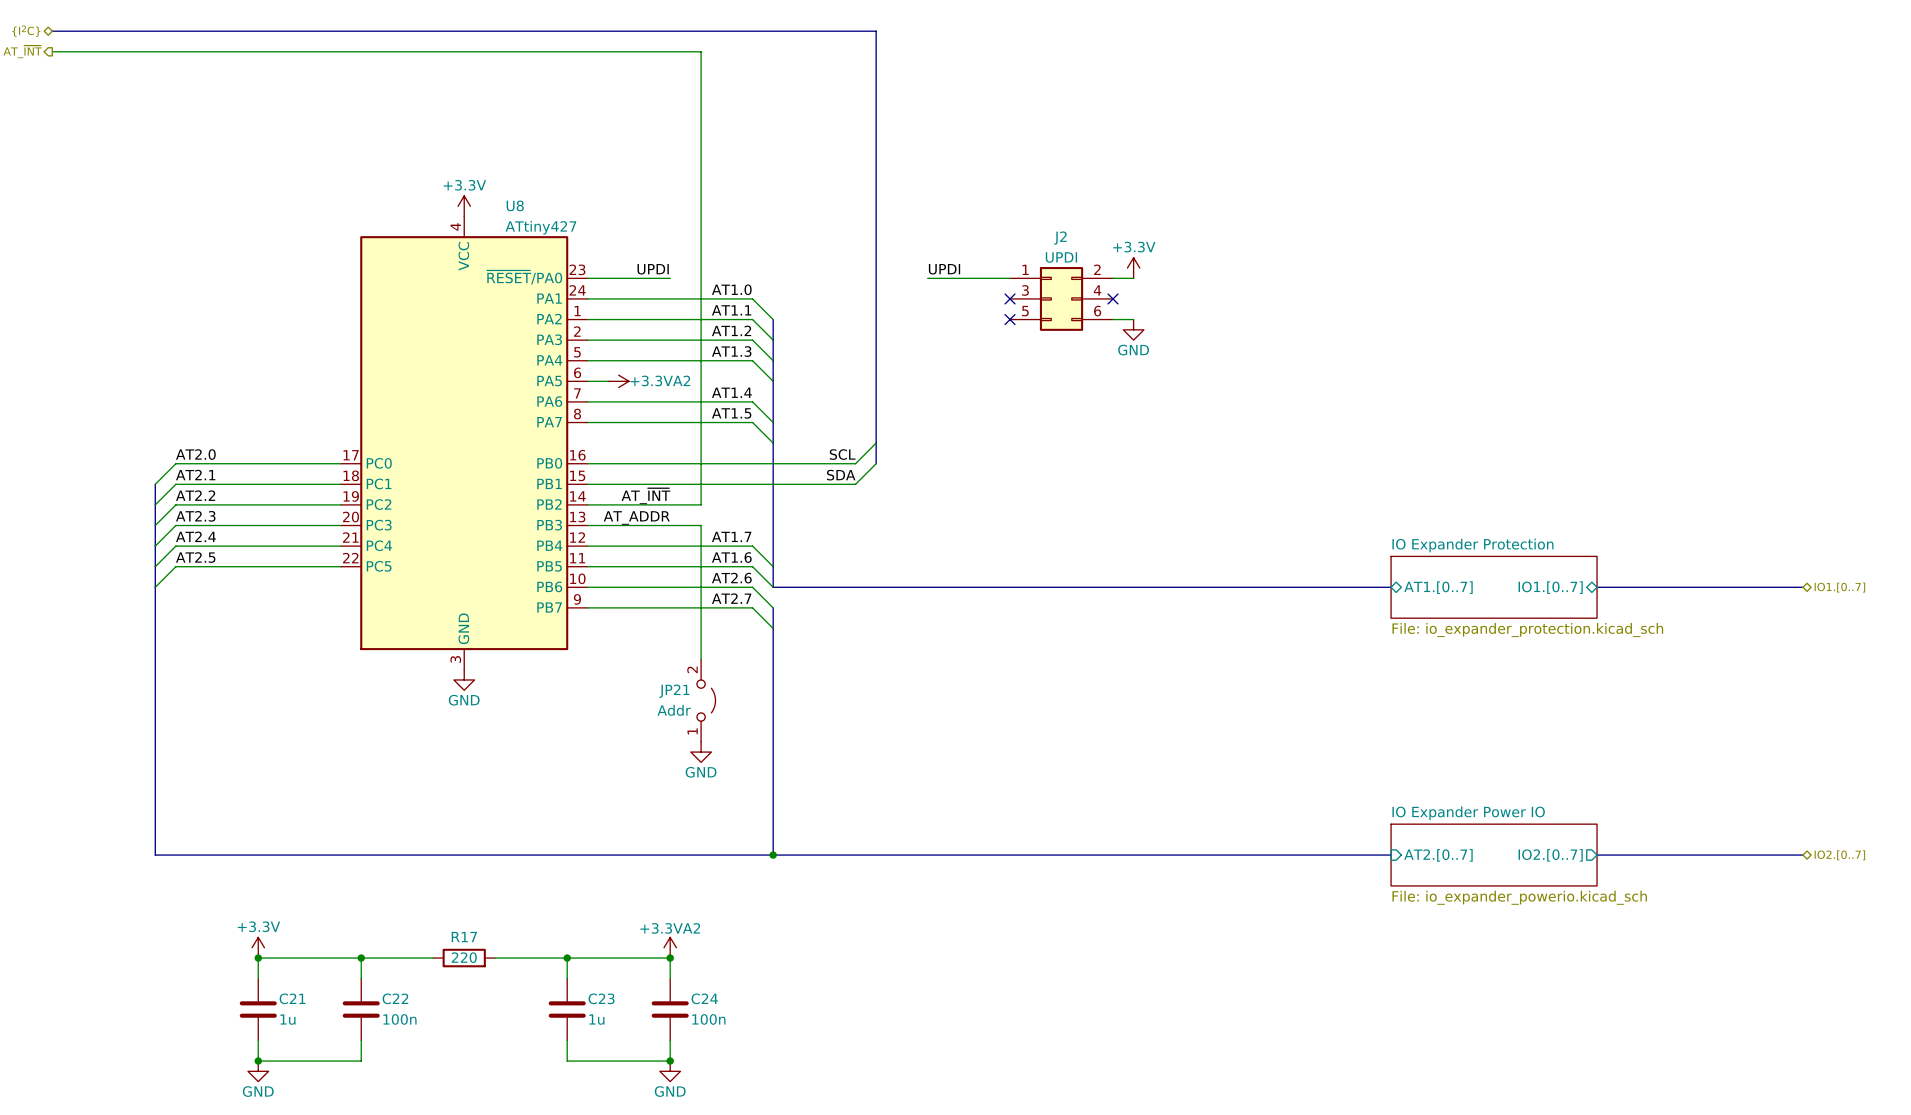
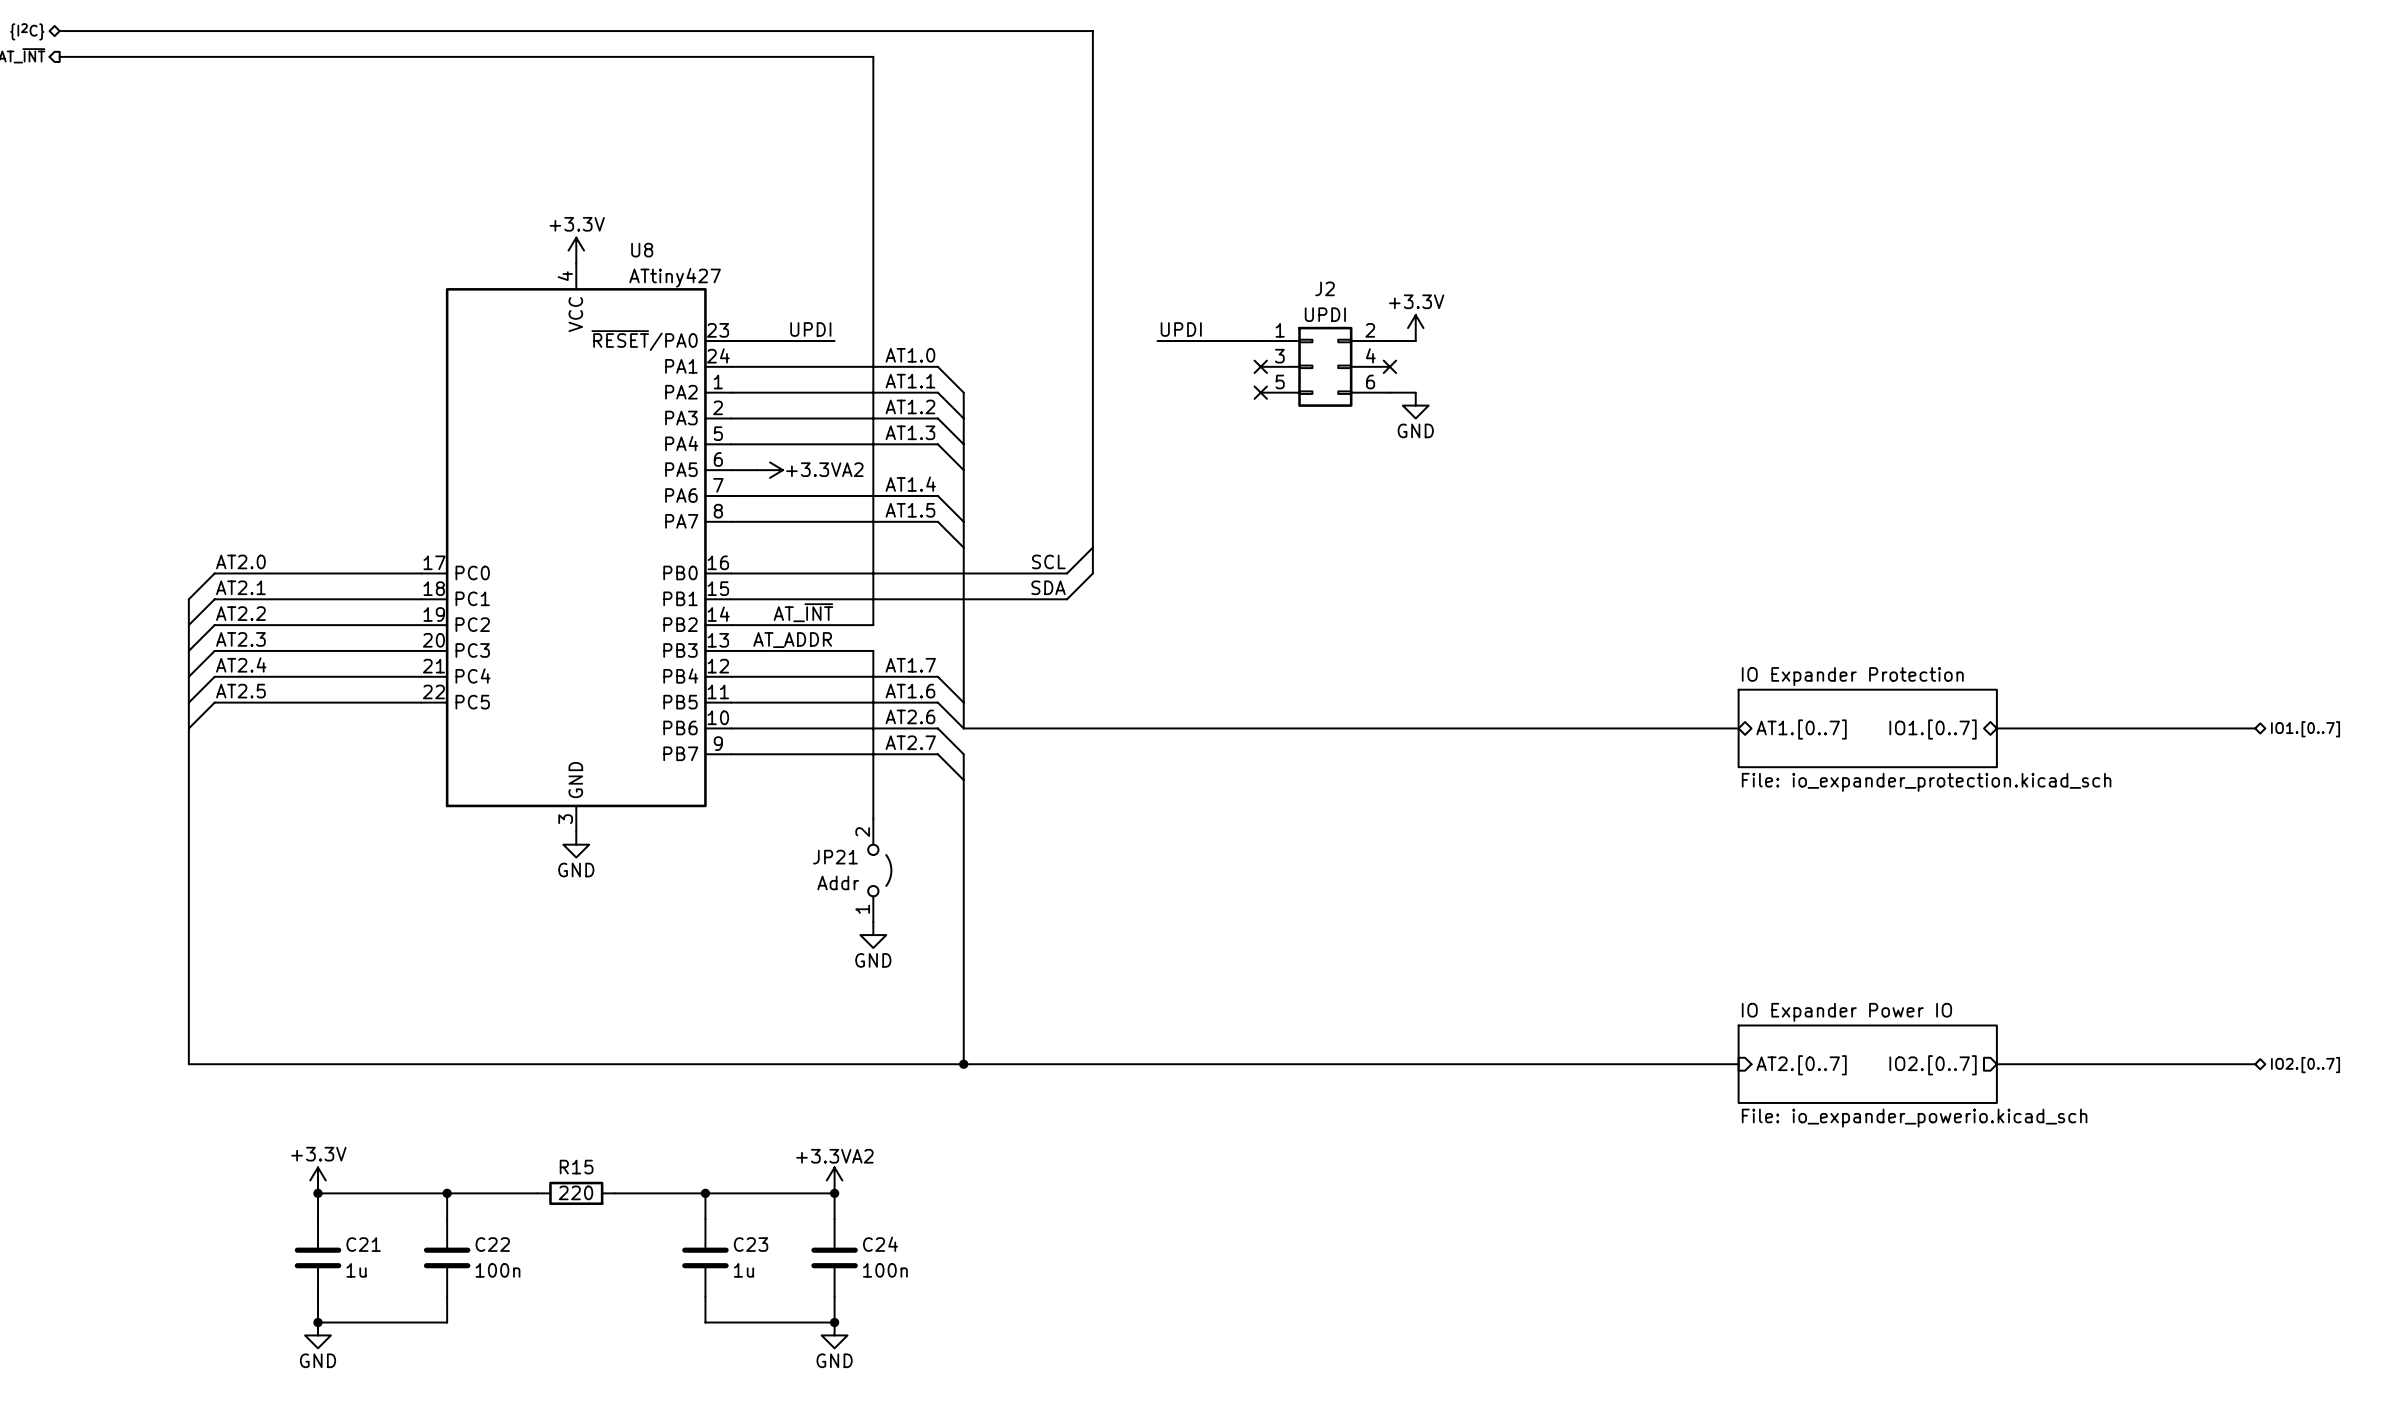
R17 name: R17 (464, 937) -> R15 (576, 1167)

